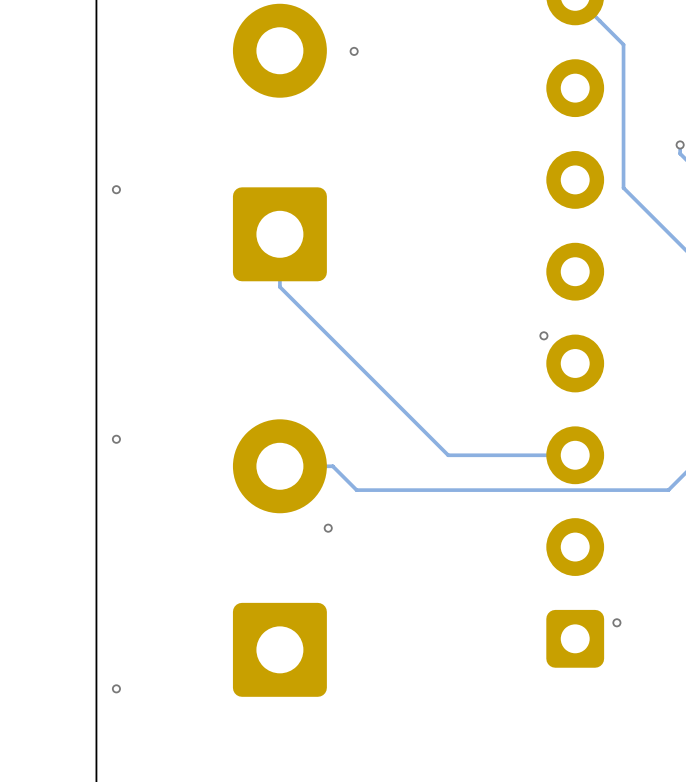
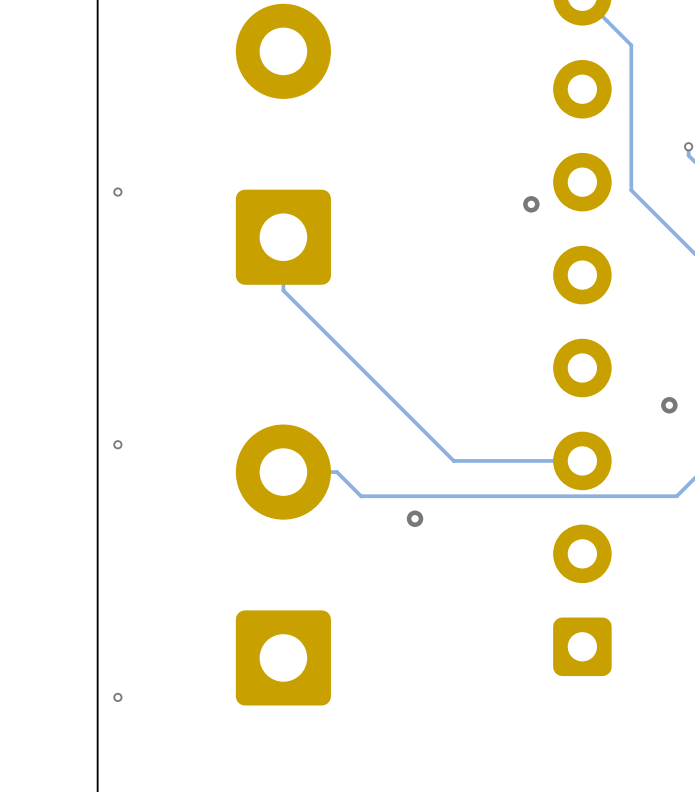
via: (354, 51) -> none
via: none -> (531, 204)
via: (543, 335) -> none
via: none -> (669, 405)
via: none -> (415, 518)
via: (328, 528) -> none
via: (616, 622) -> none

